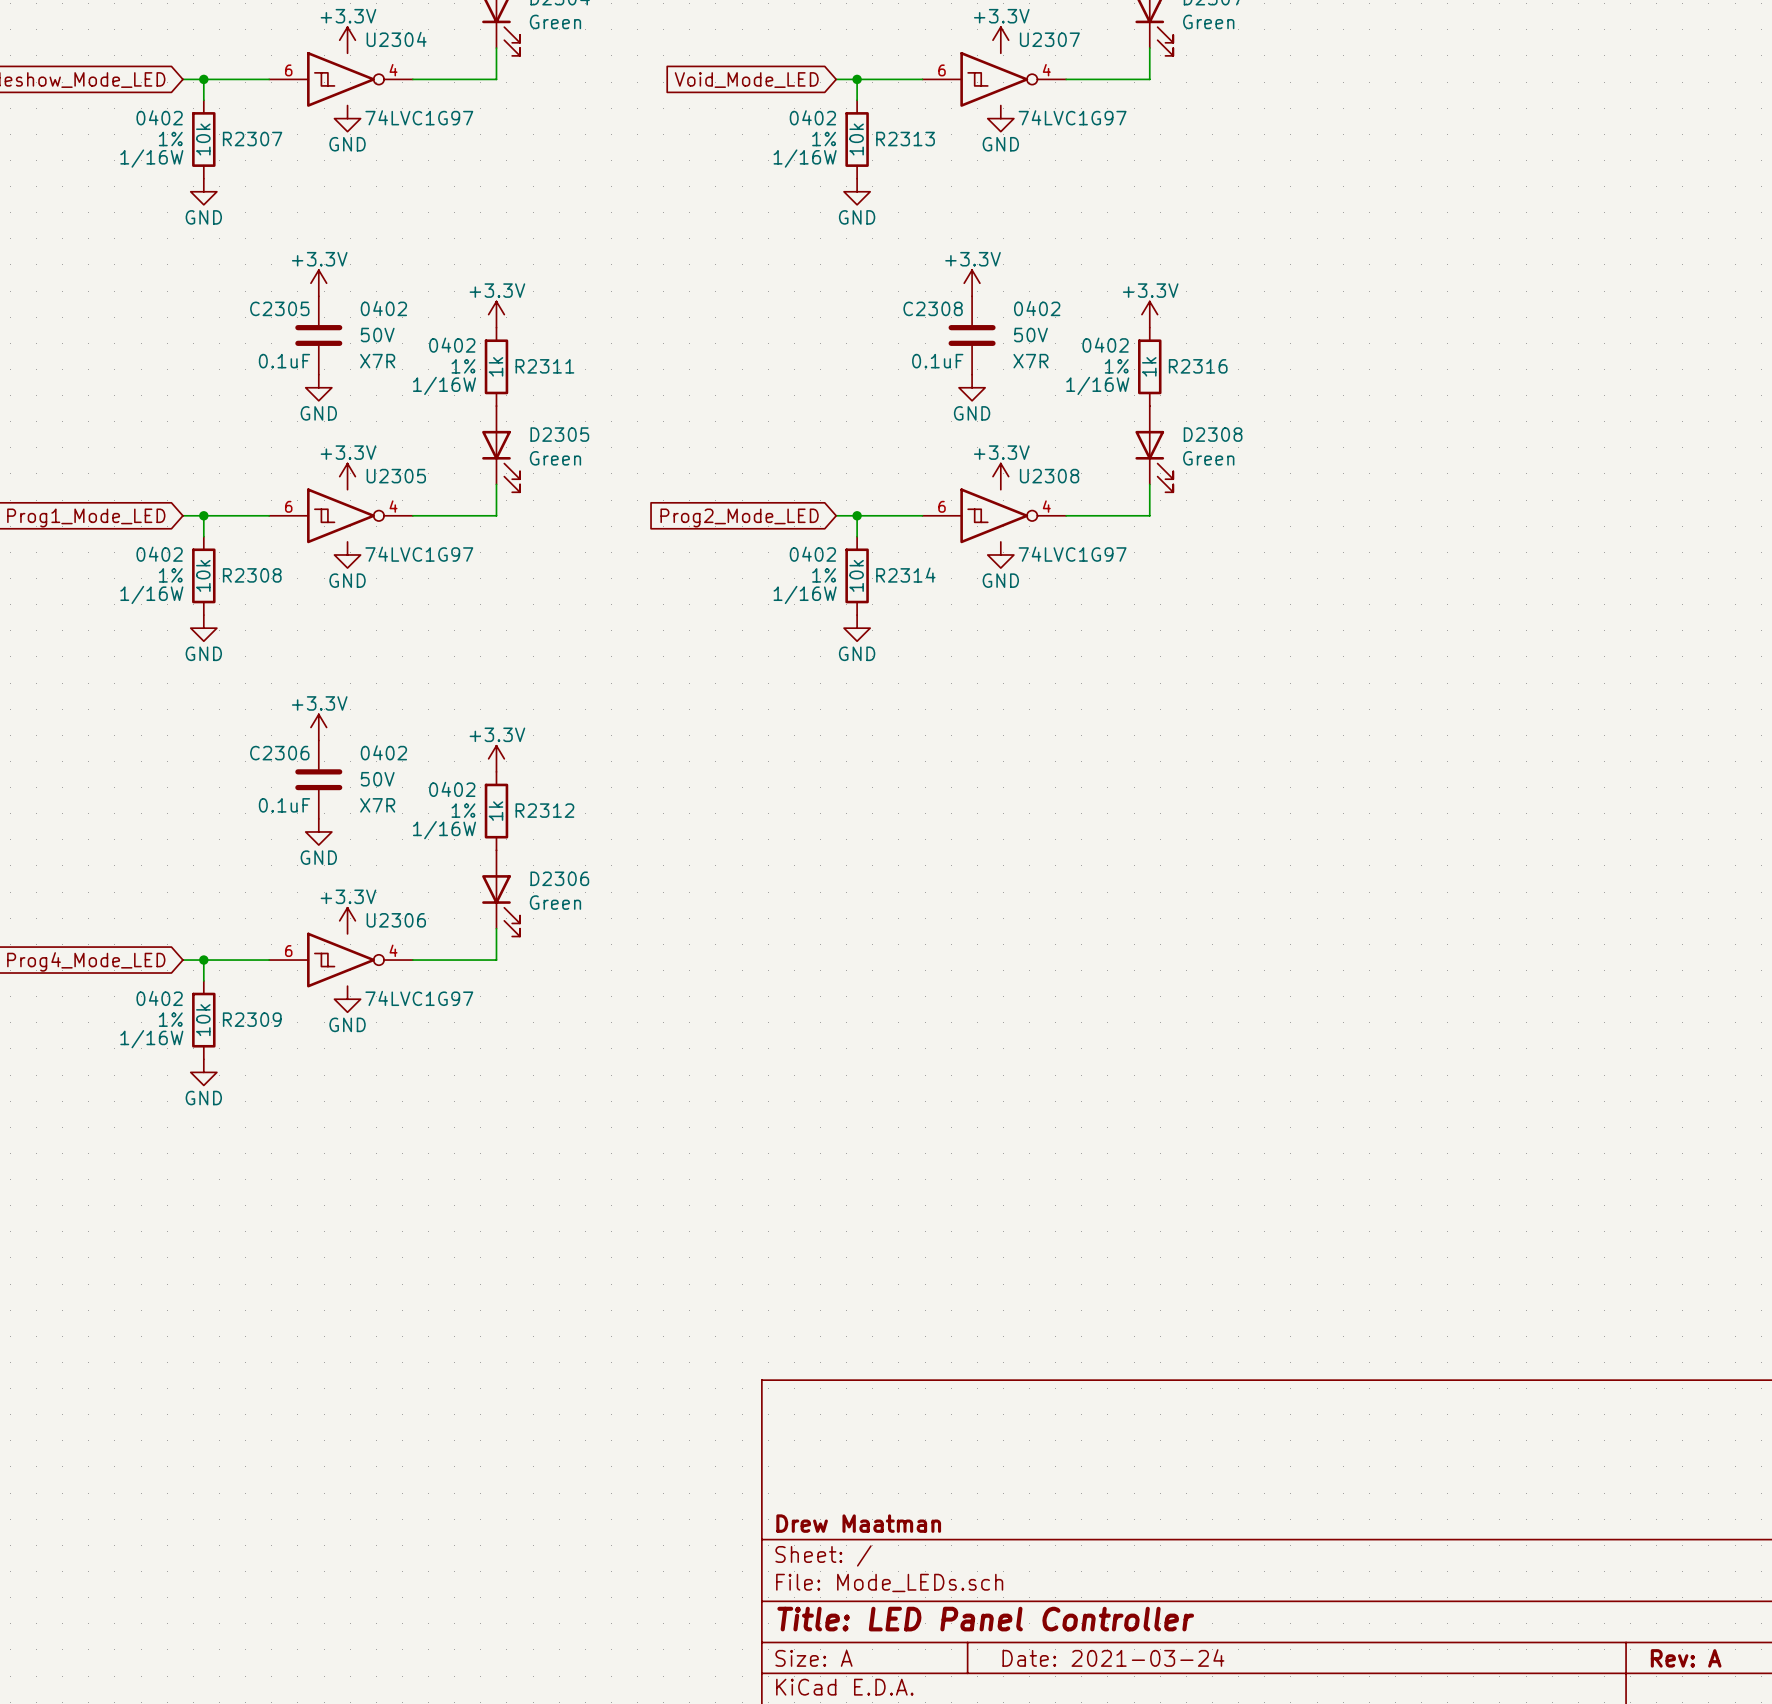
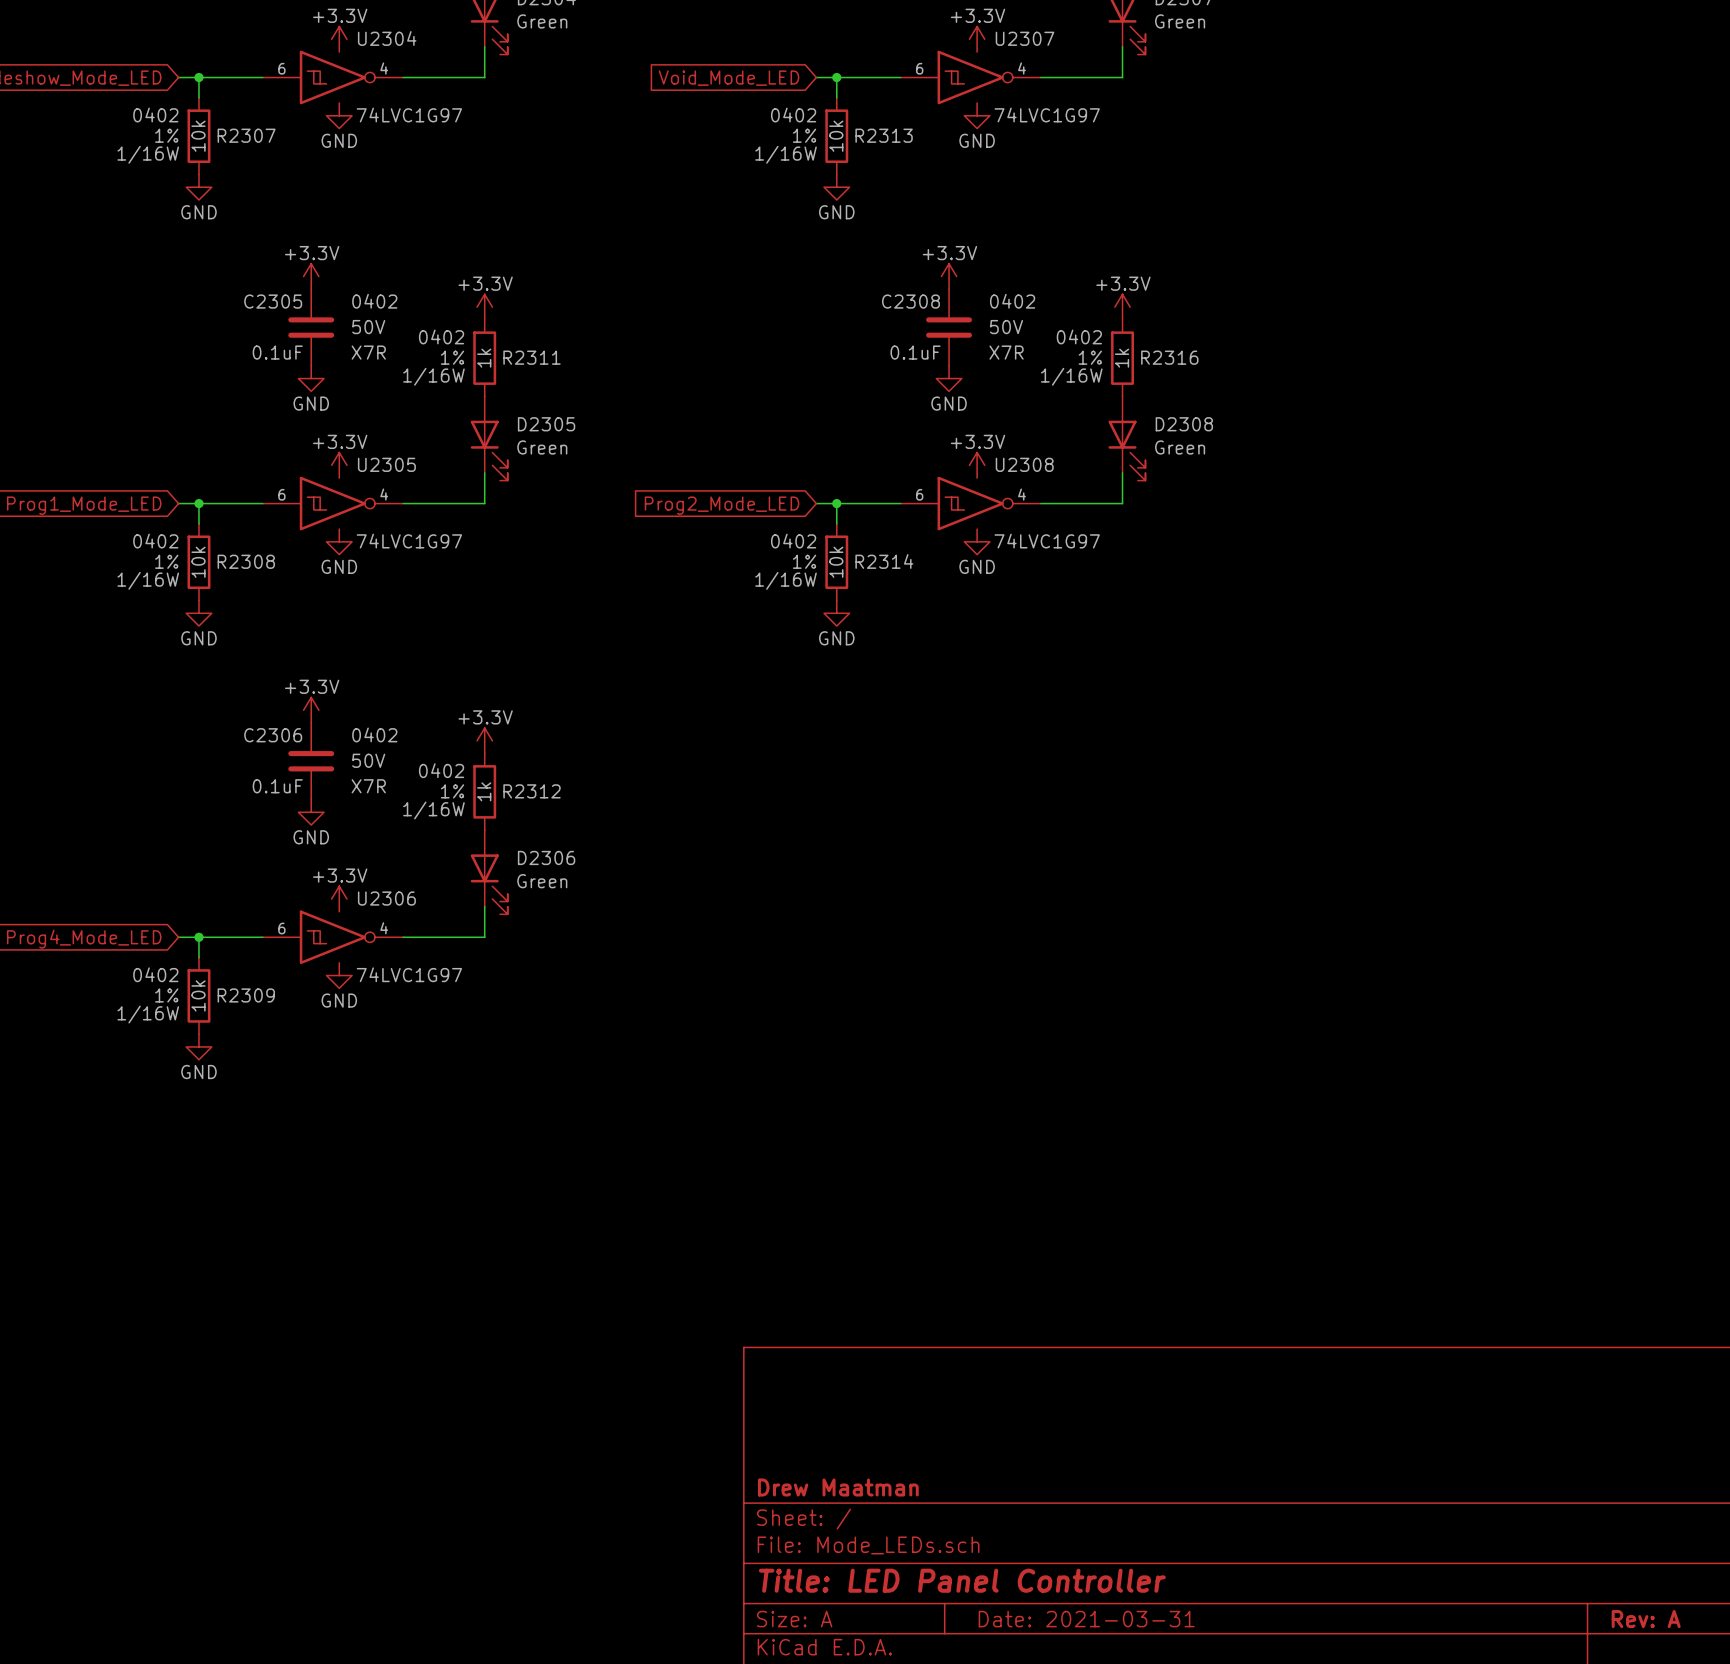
title block: Date: 2021-03-24 (1113, 1658) -> Date: 2021-03-31 (1086, 1619)

